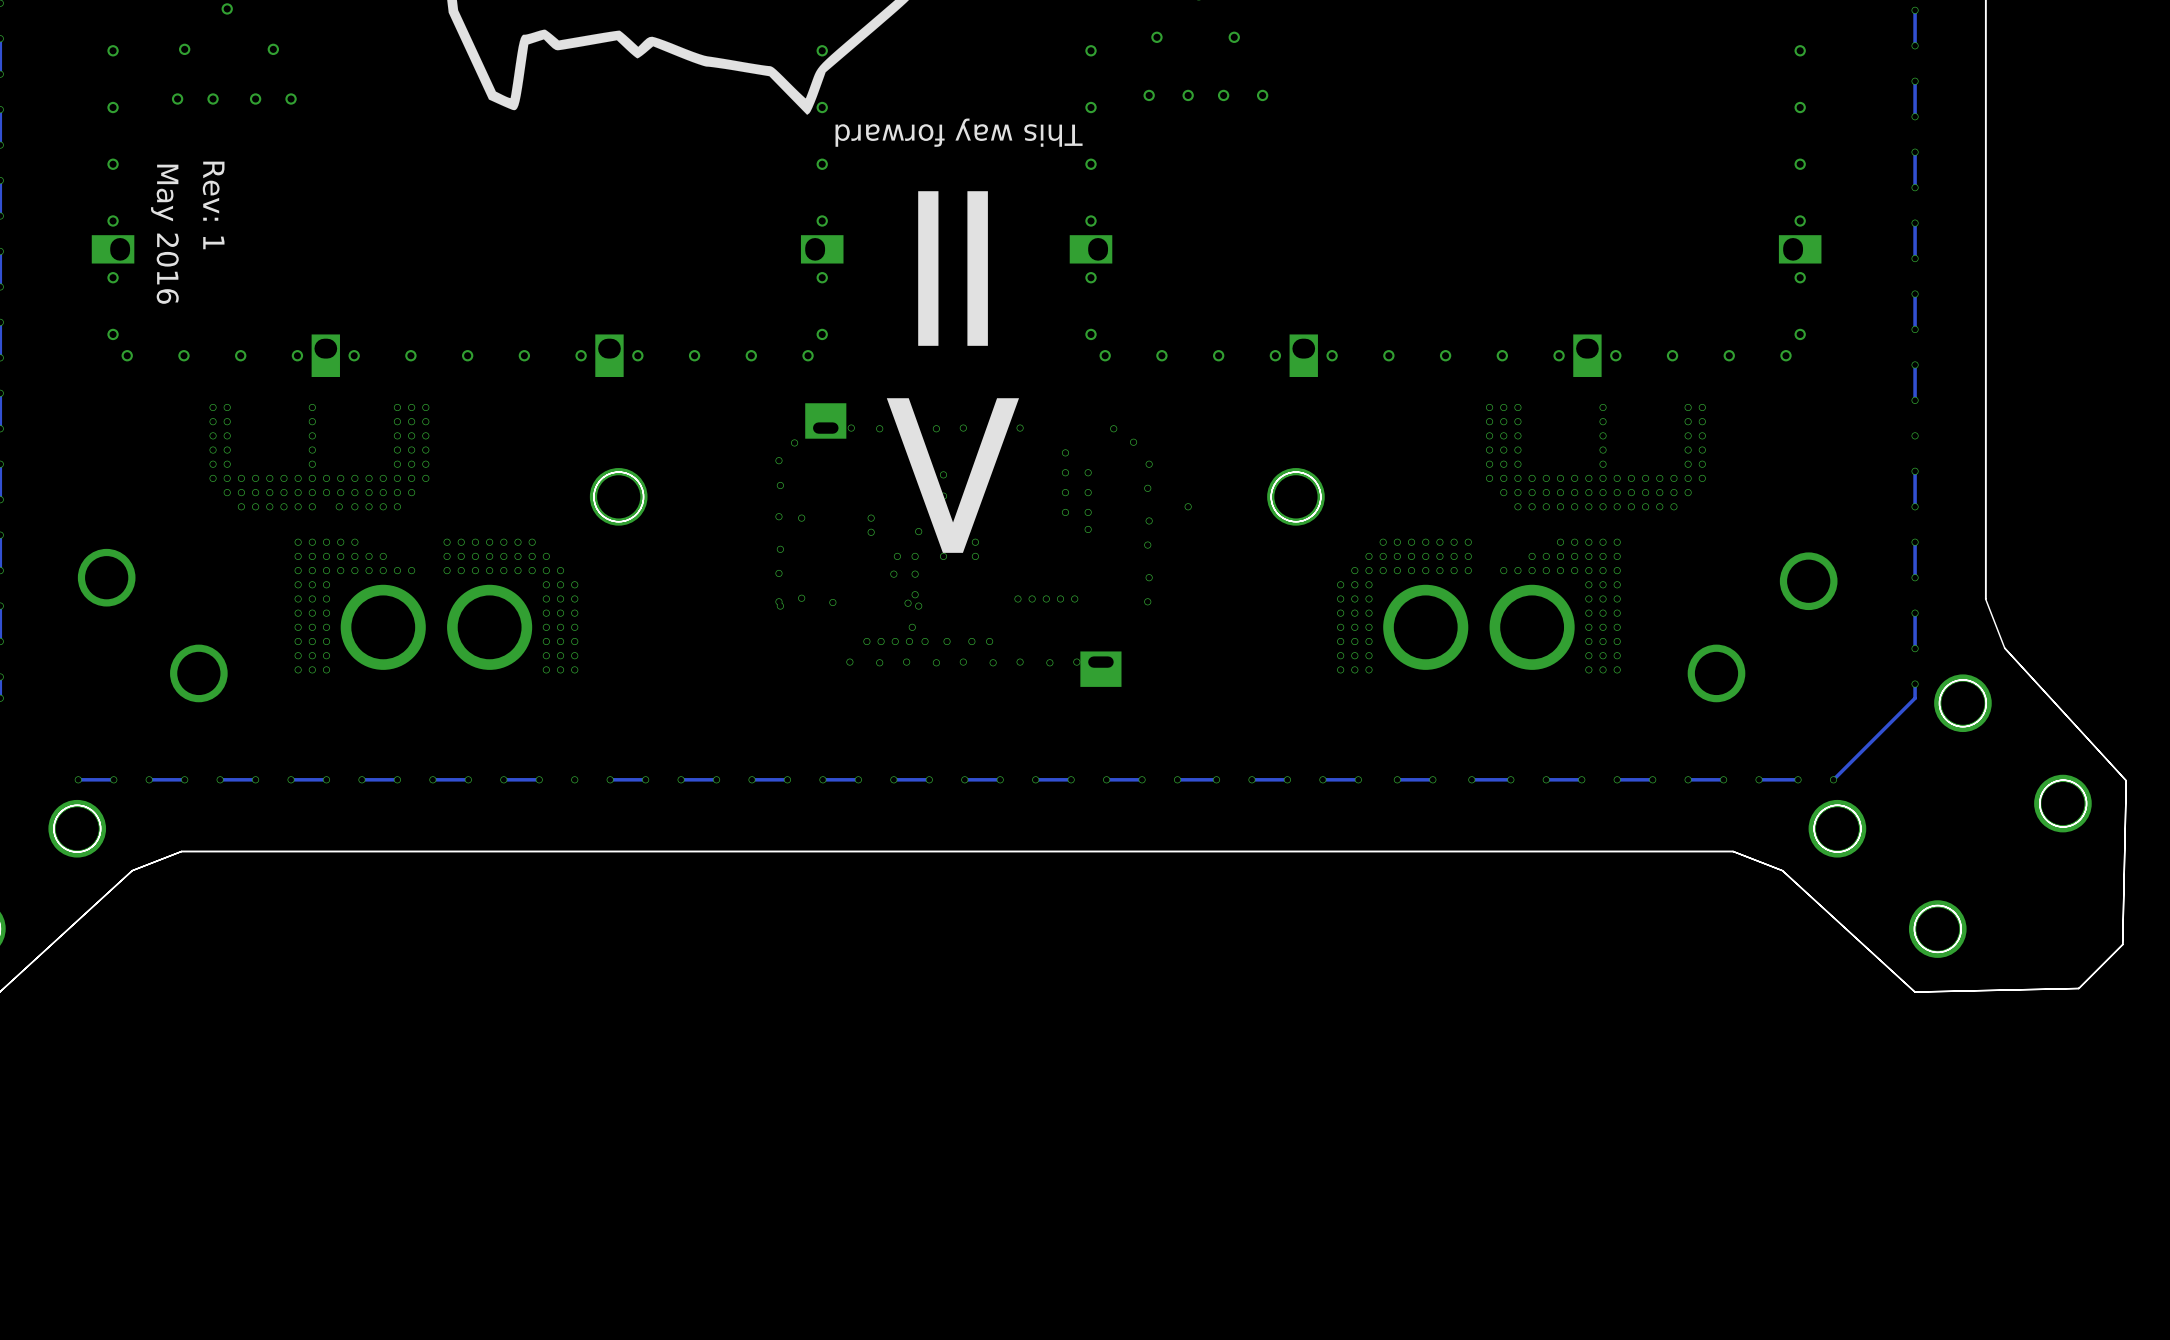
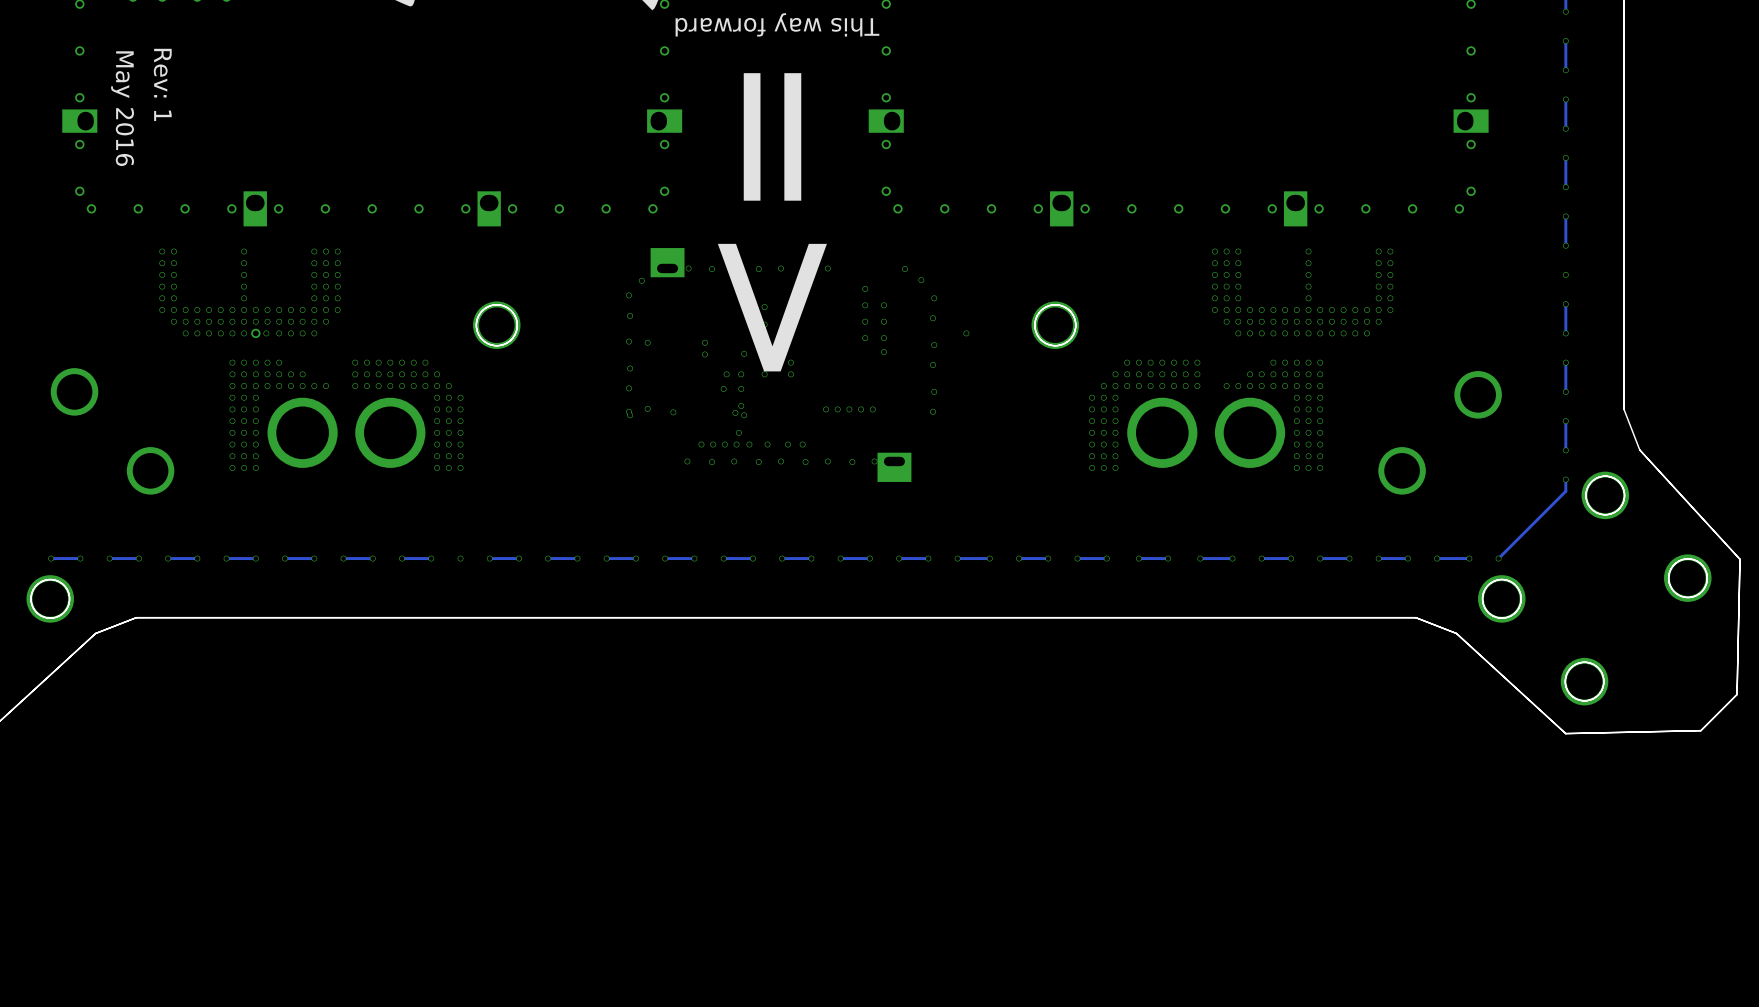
via: none -> (255, 333)

